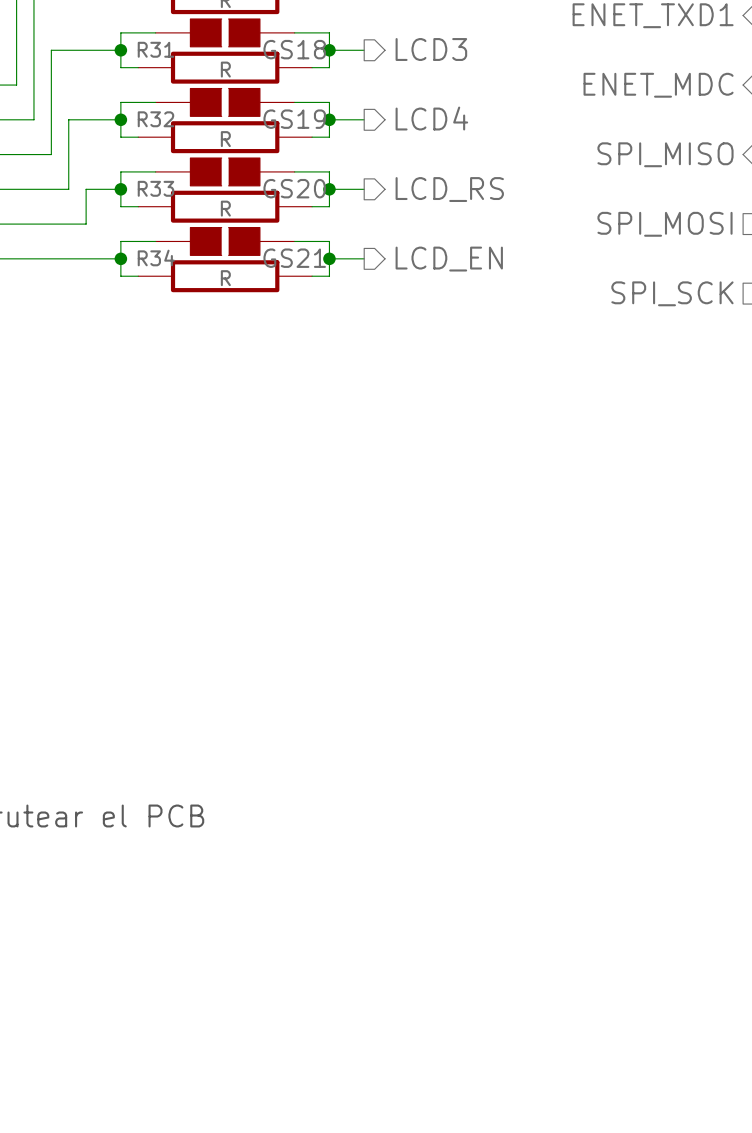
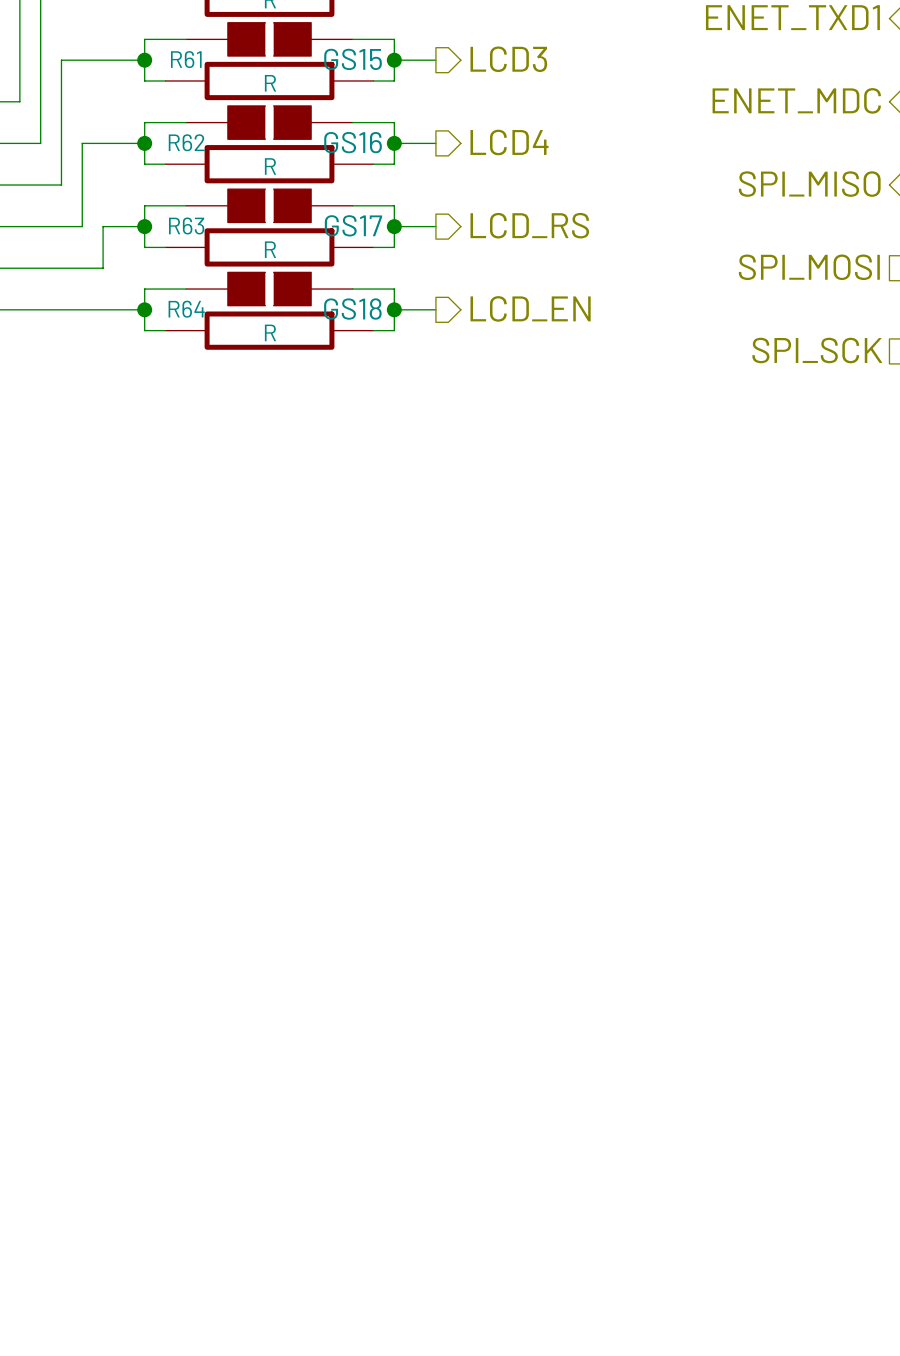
R31 name: R31 (155, 49) -> R61 (186, 59)
GS18 name: GS18 (294, 49) -> GS15 (353, 59)
R32 name: R32 (155, 119) -> R62 (186, 142)
GS19 name: GS19 (294, 119) -> GS16 (353, 142)
R33 name: R33 (155, 188) -> R63 (186, 225)
GS20 name: GS20 (294, 188) -> GS17 (353, 225)
R34 name: R34 (156, 257) -> R64 (186, 309)
GS21 name: GS21 (294, 258) -> GS18 (352, 309)

